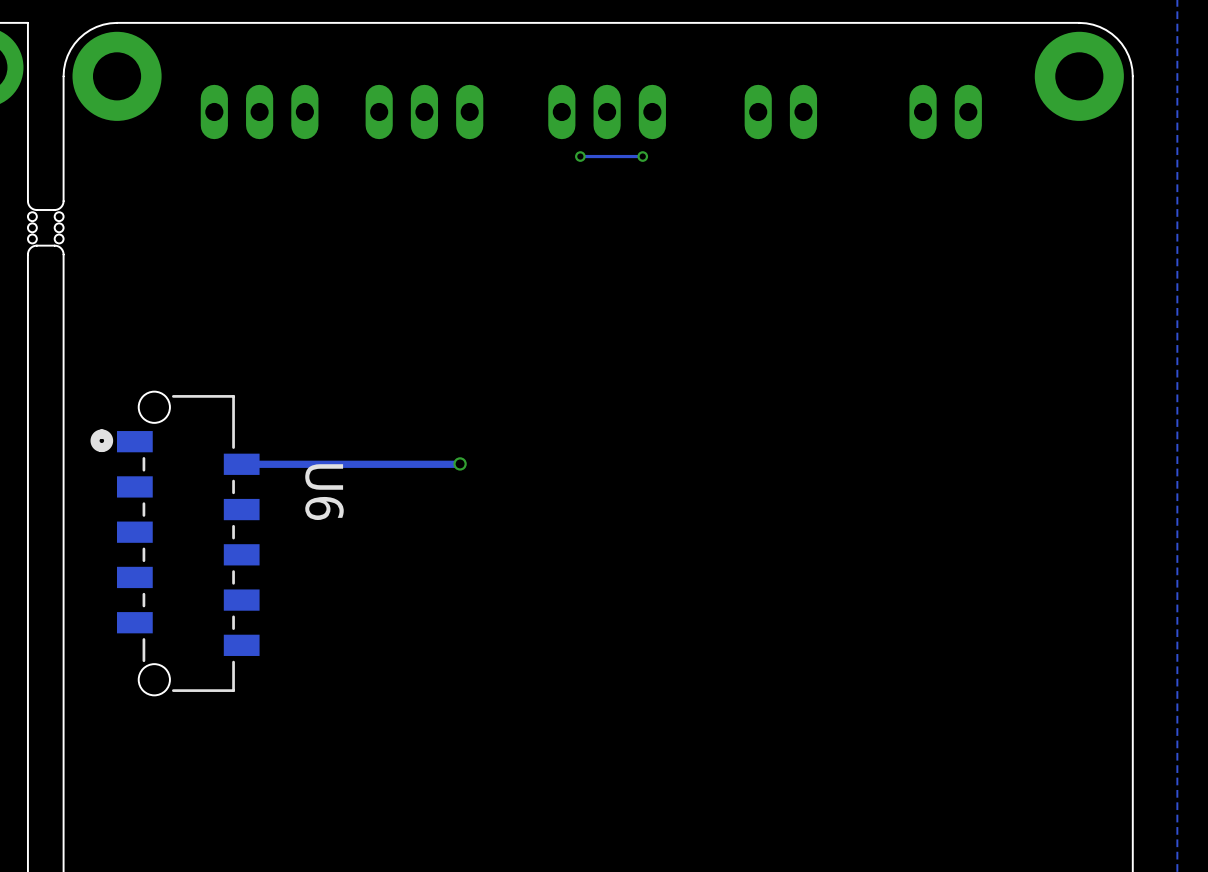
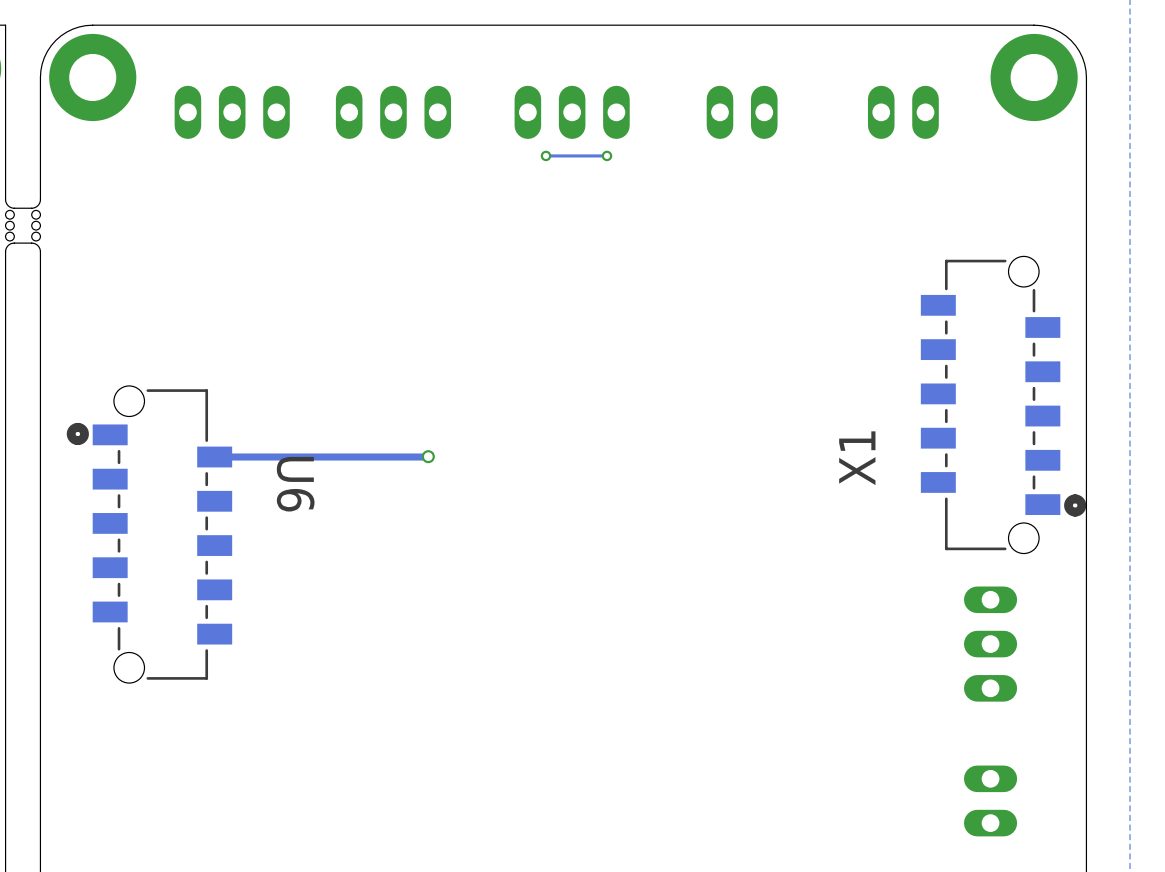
X1: none -> (1003, 404)
part: none -> (990, 644)
part: none -> (990, 800)

